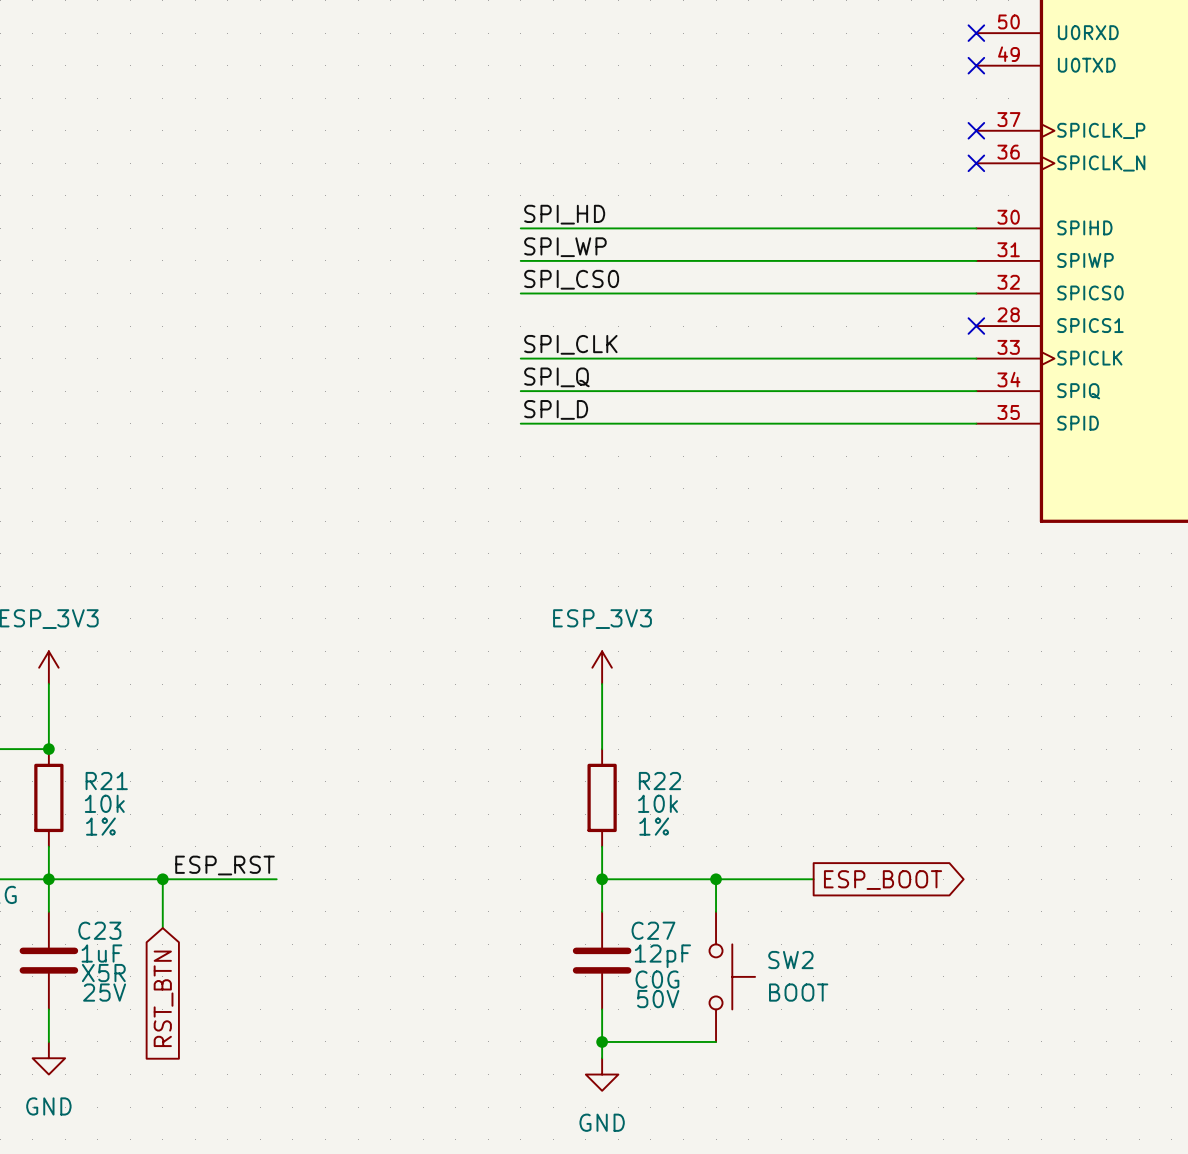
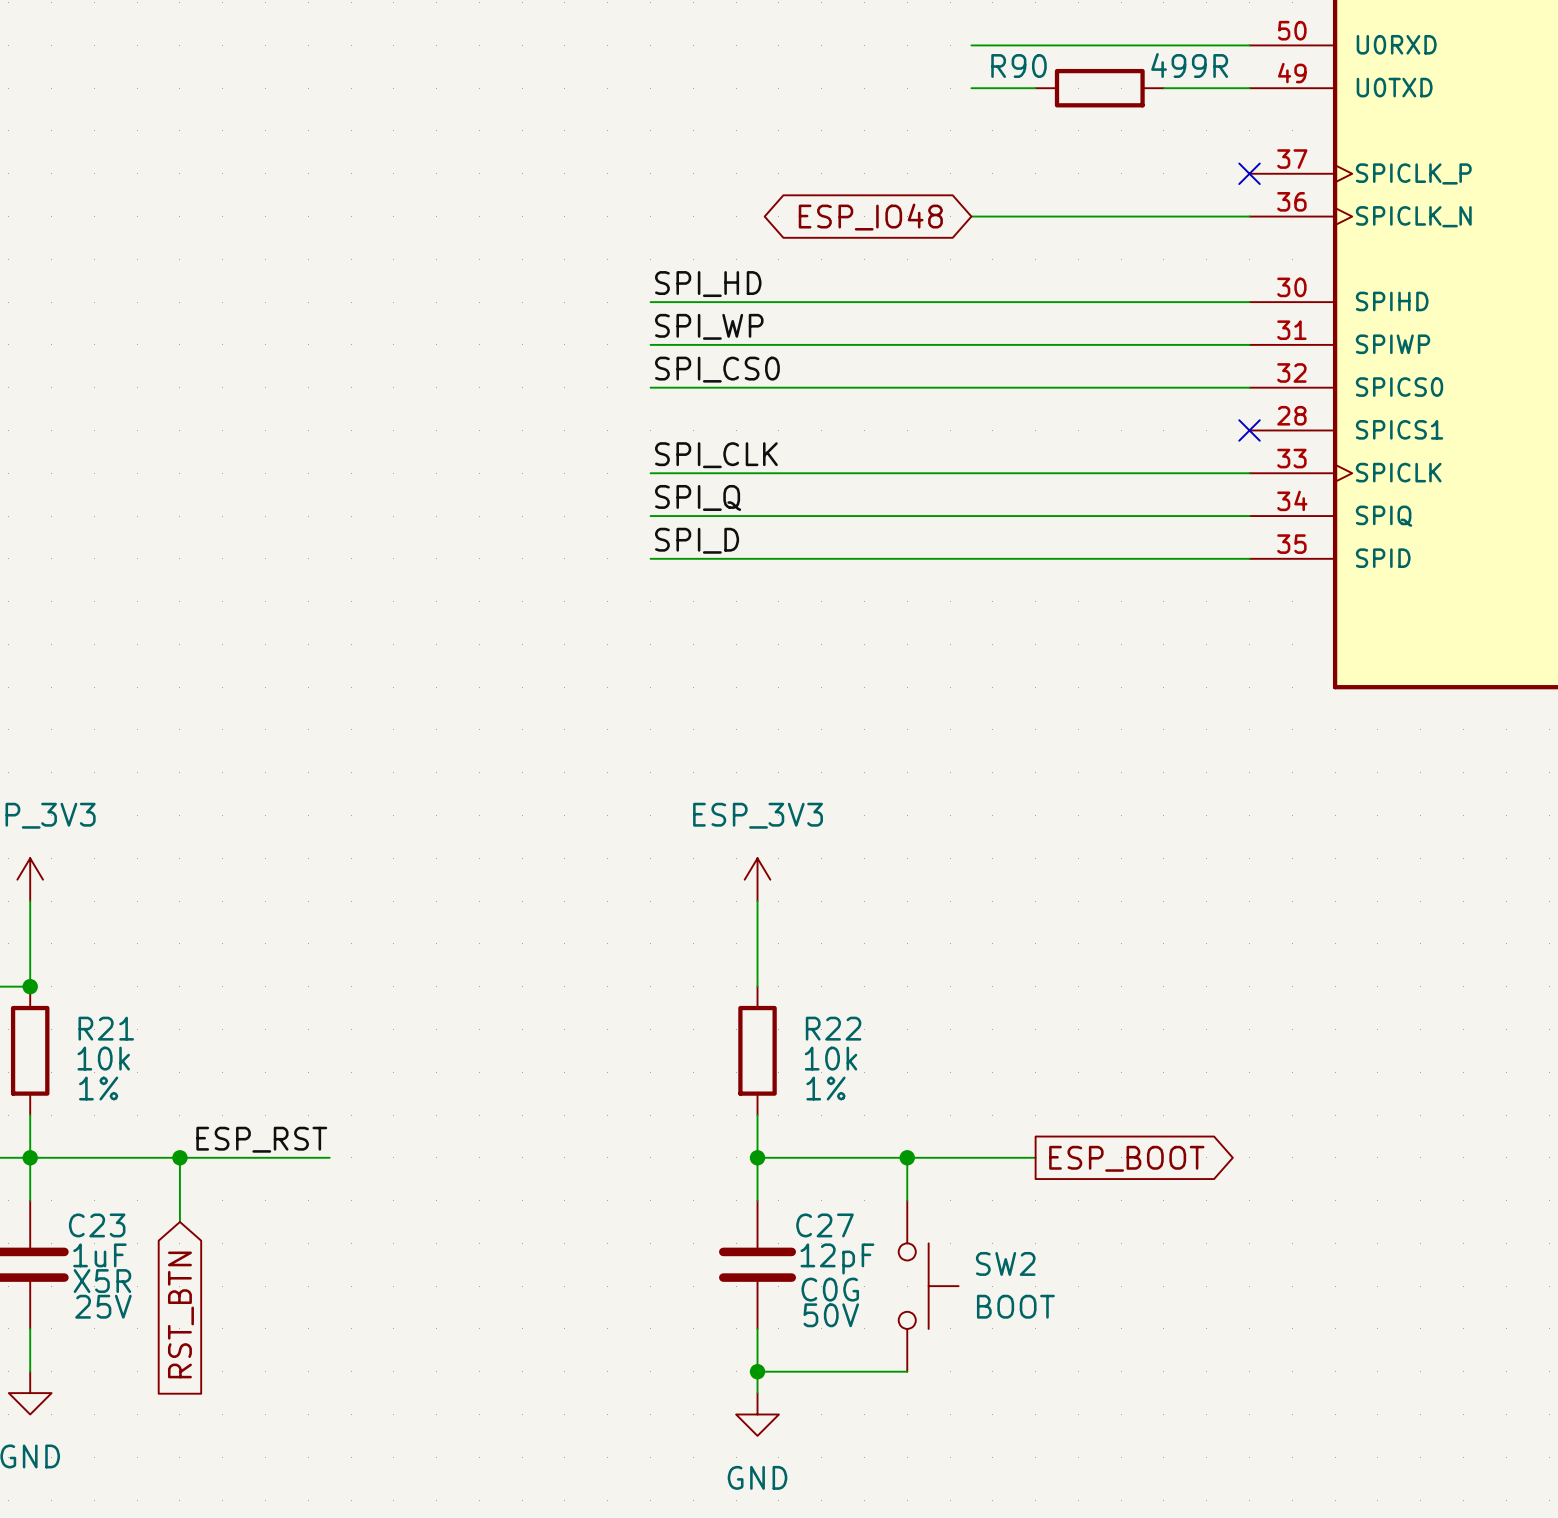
wire: none -> (971, 45) (1249, 45)
no-connect mark: (976, 33) -> none
wire: none -> (971, 88) (1035, 88)
R90: none -> 499R (1099, 88)
wire: none -> (1163, 88) (1249, 88)
no-connect mark: (976, 65) -> none
global label: none -> ESP_IO48 (870, 217)
wire: none -> (971, 216) (1249, 216)
no-connect mark: (976, 163) -> none

